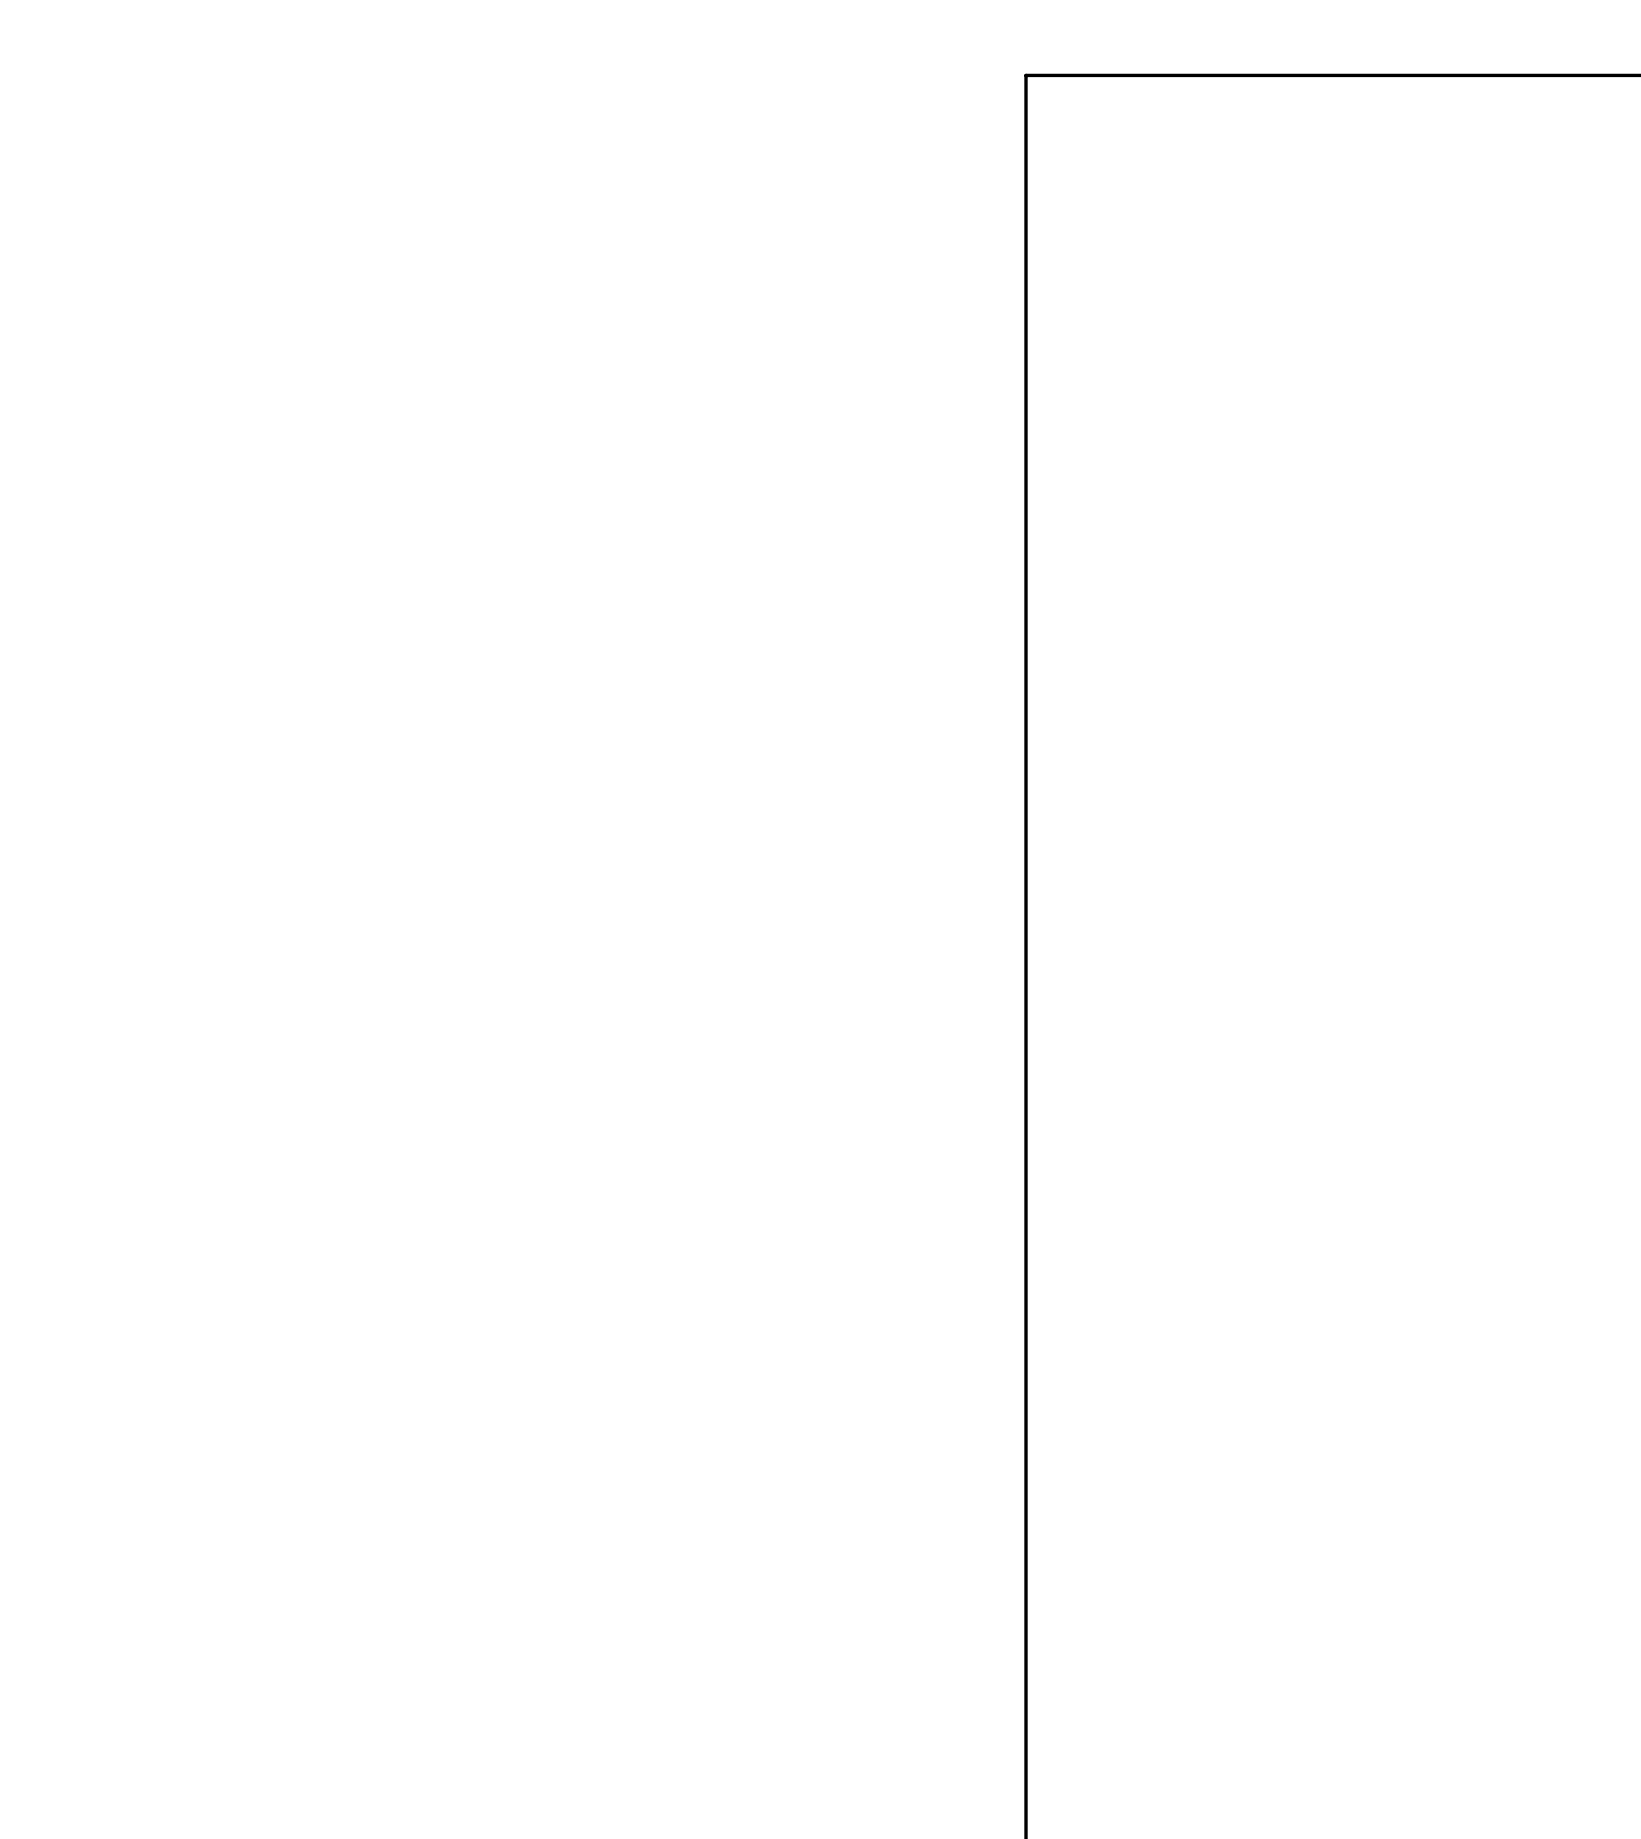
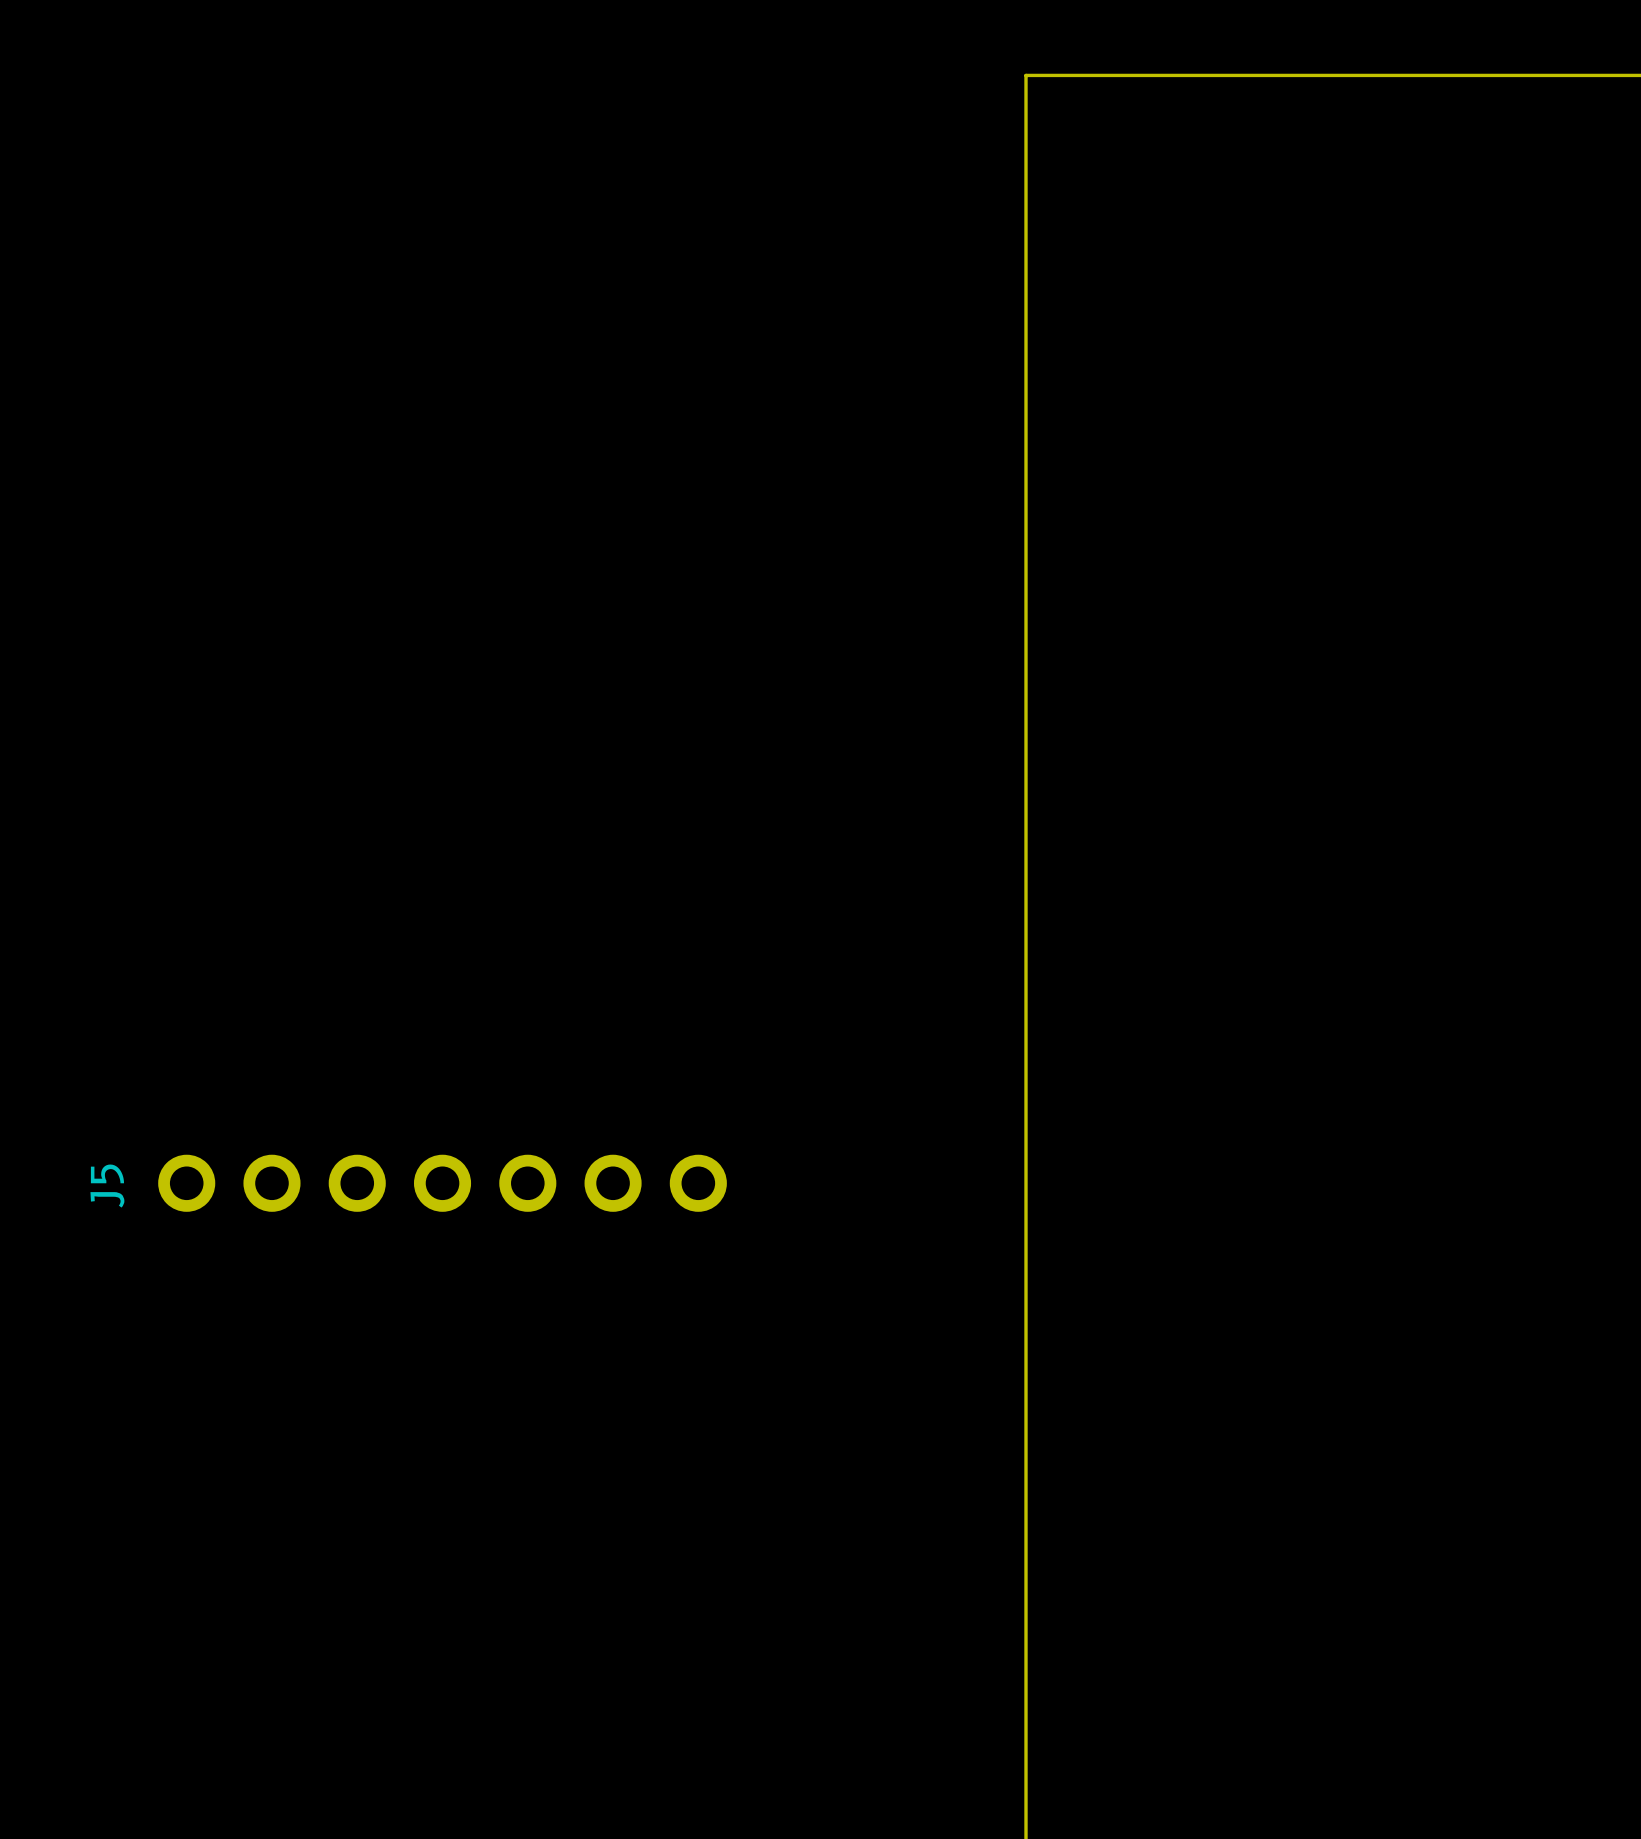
J5: none -> (442, 1183)

